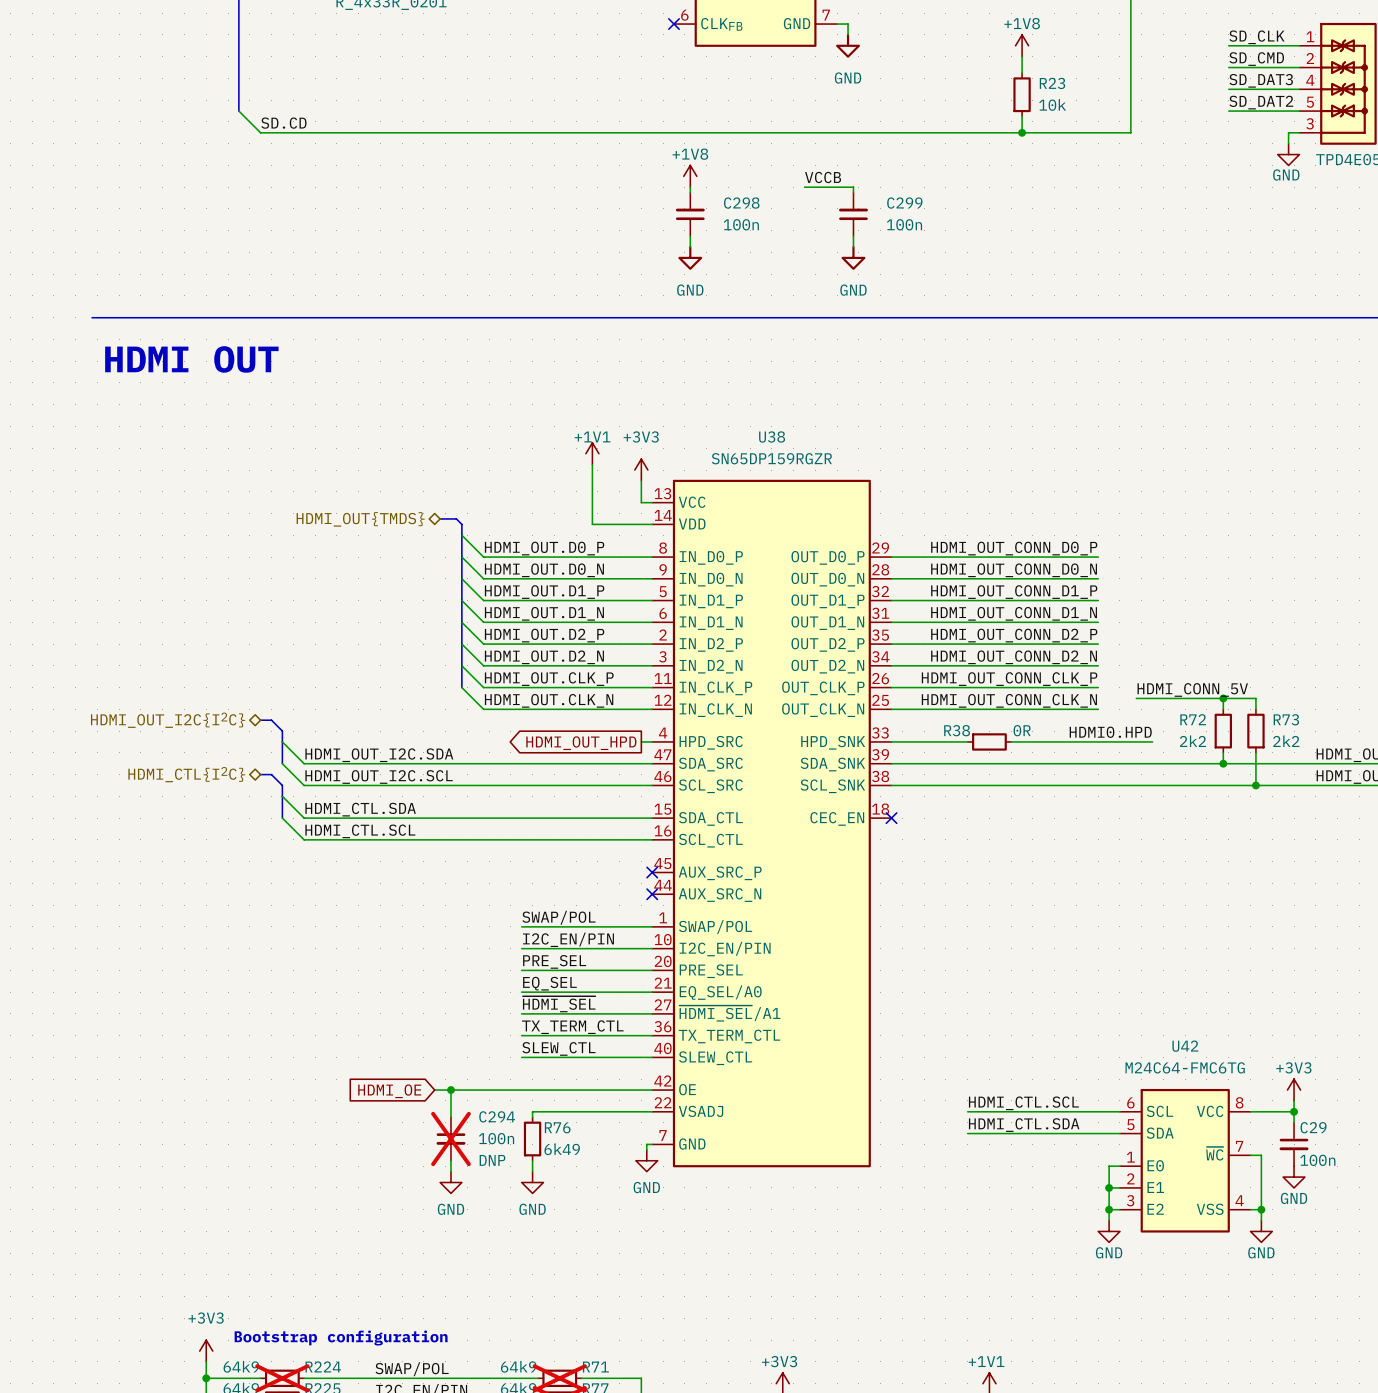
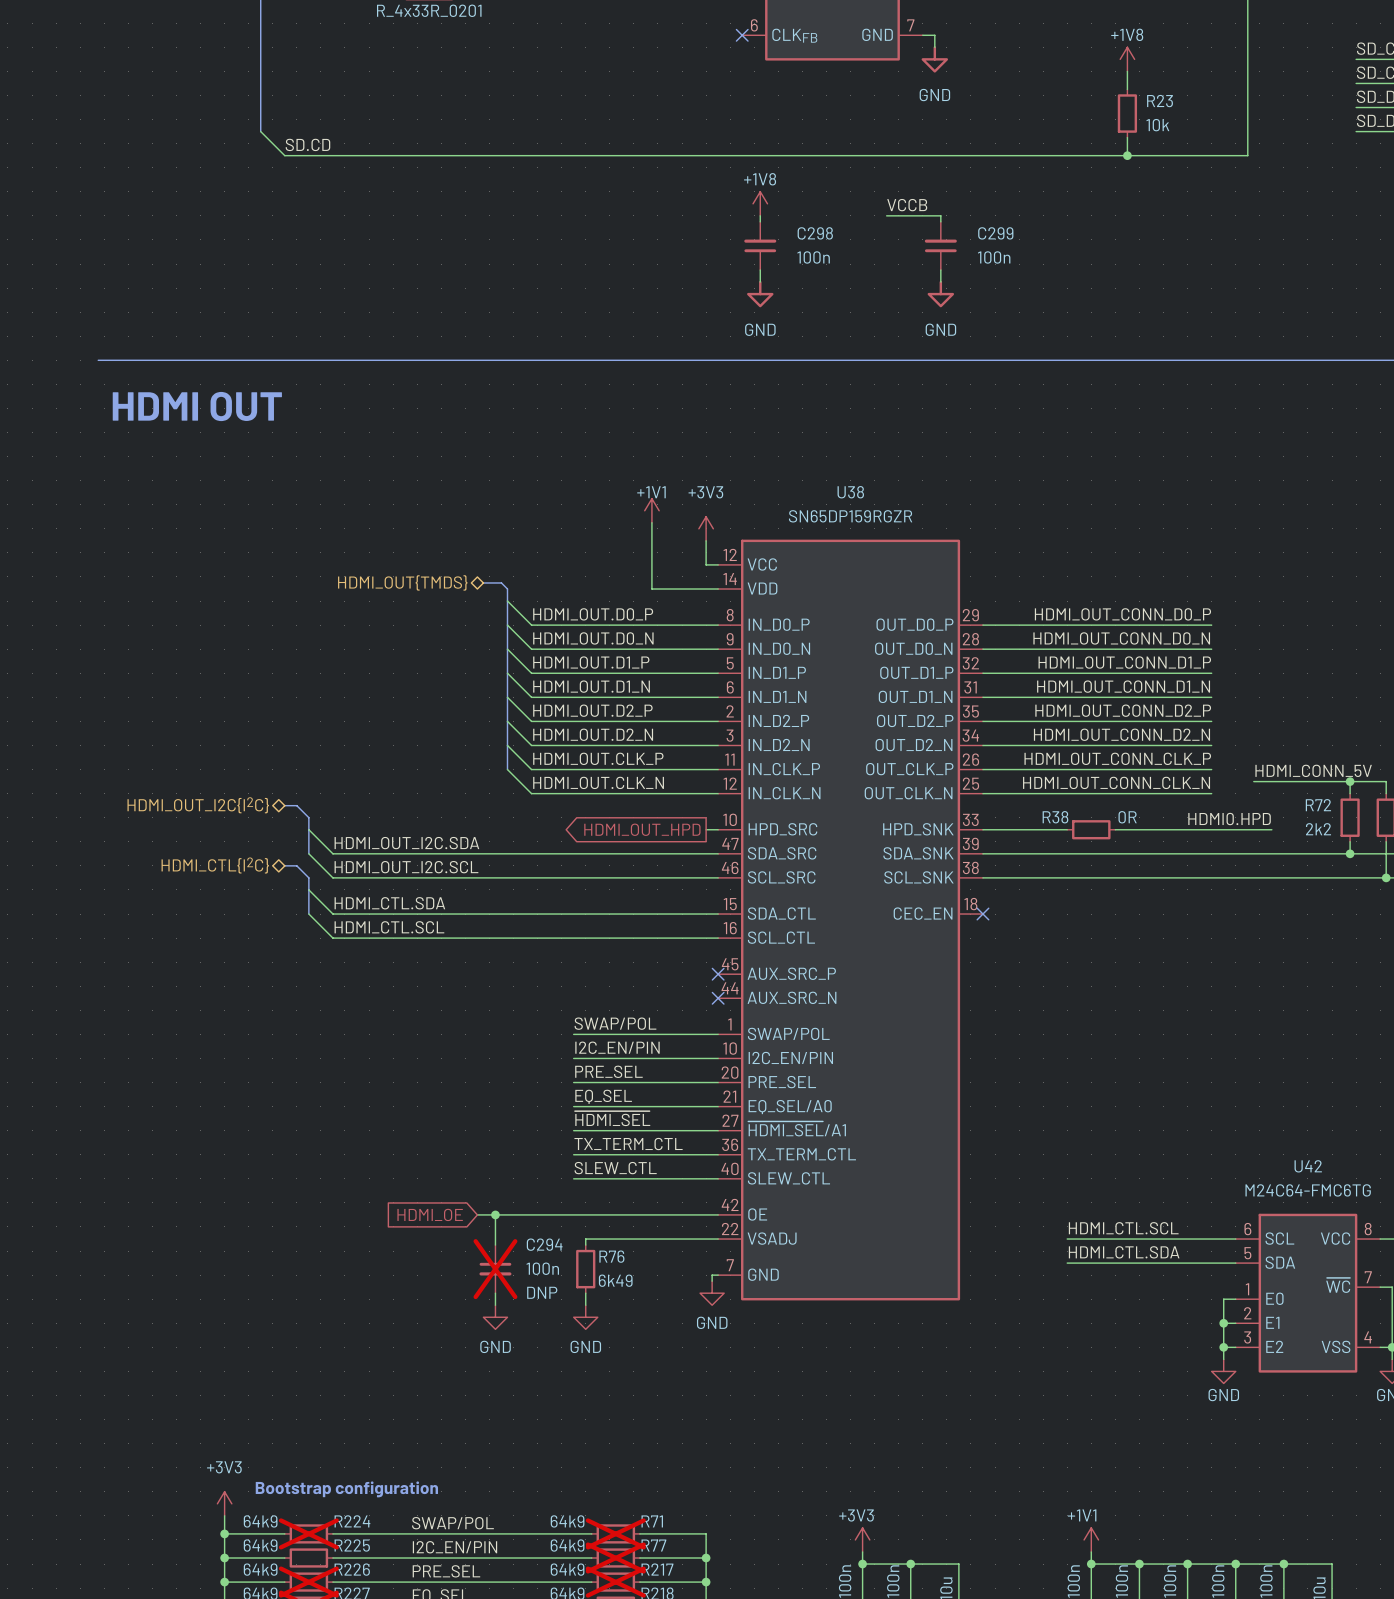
U38 pin number: 13 (662, 493) -> 12 (730, 554)
U38 pin number: 4 (663, 732) -> 10 (730, 819)

